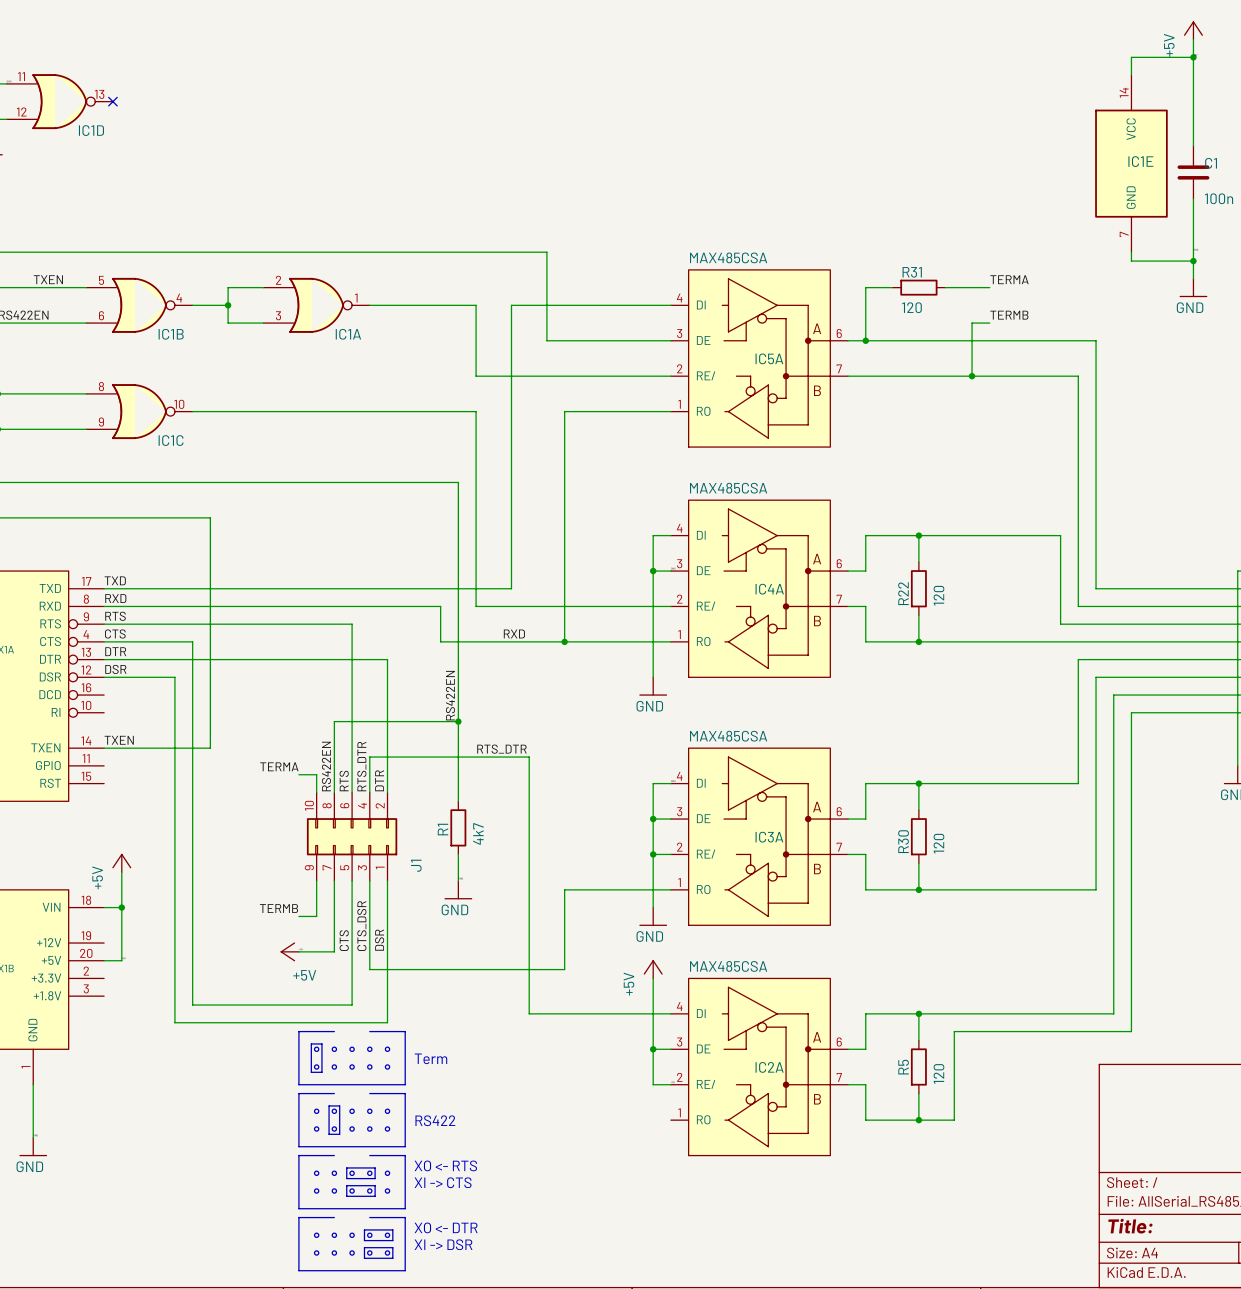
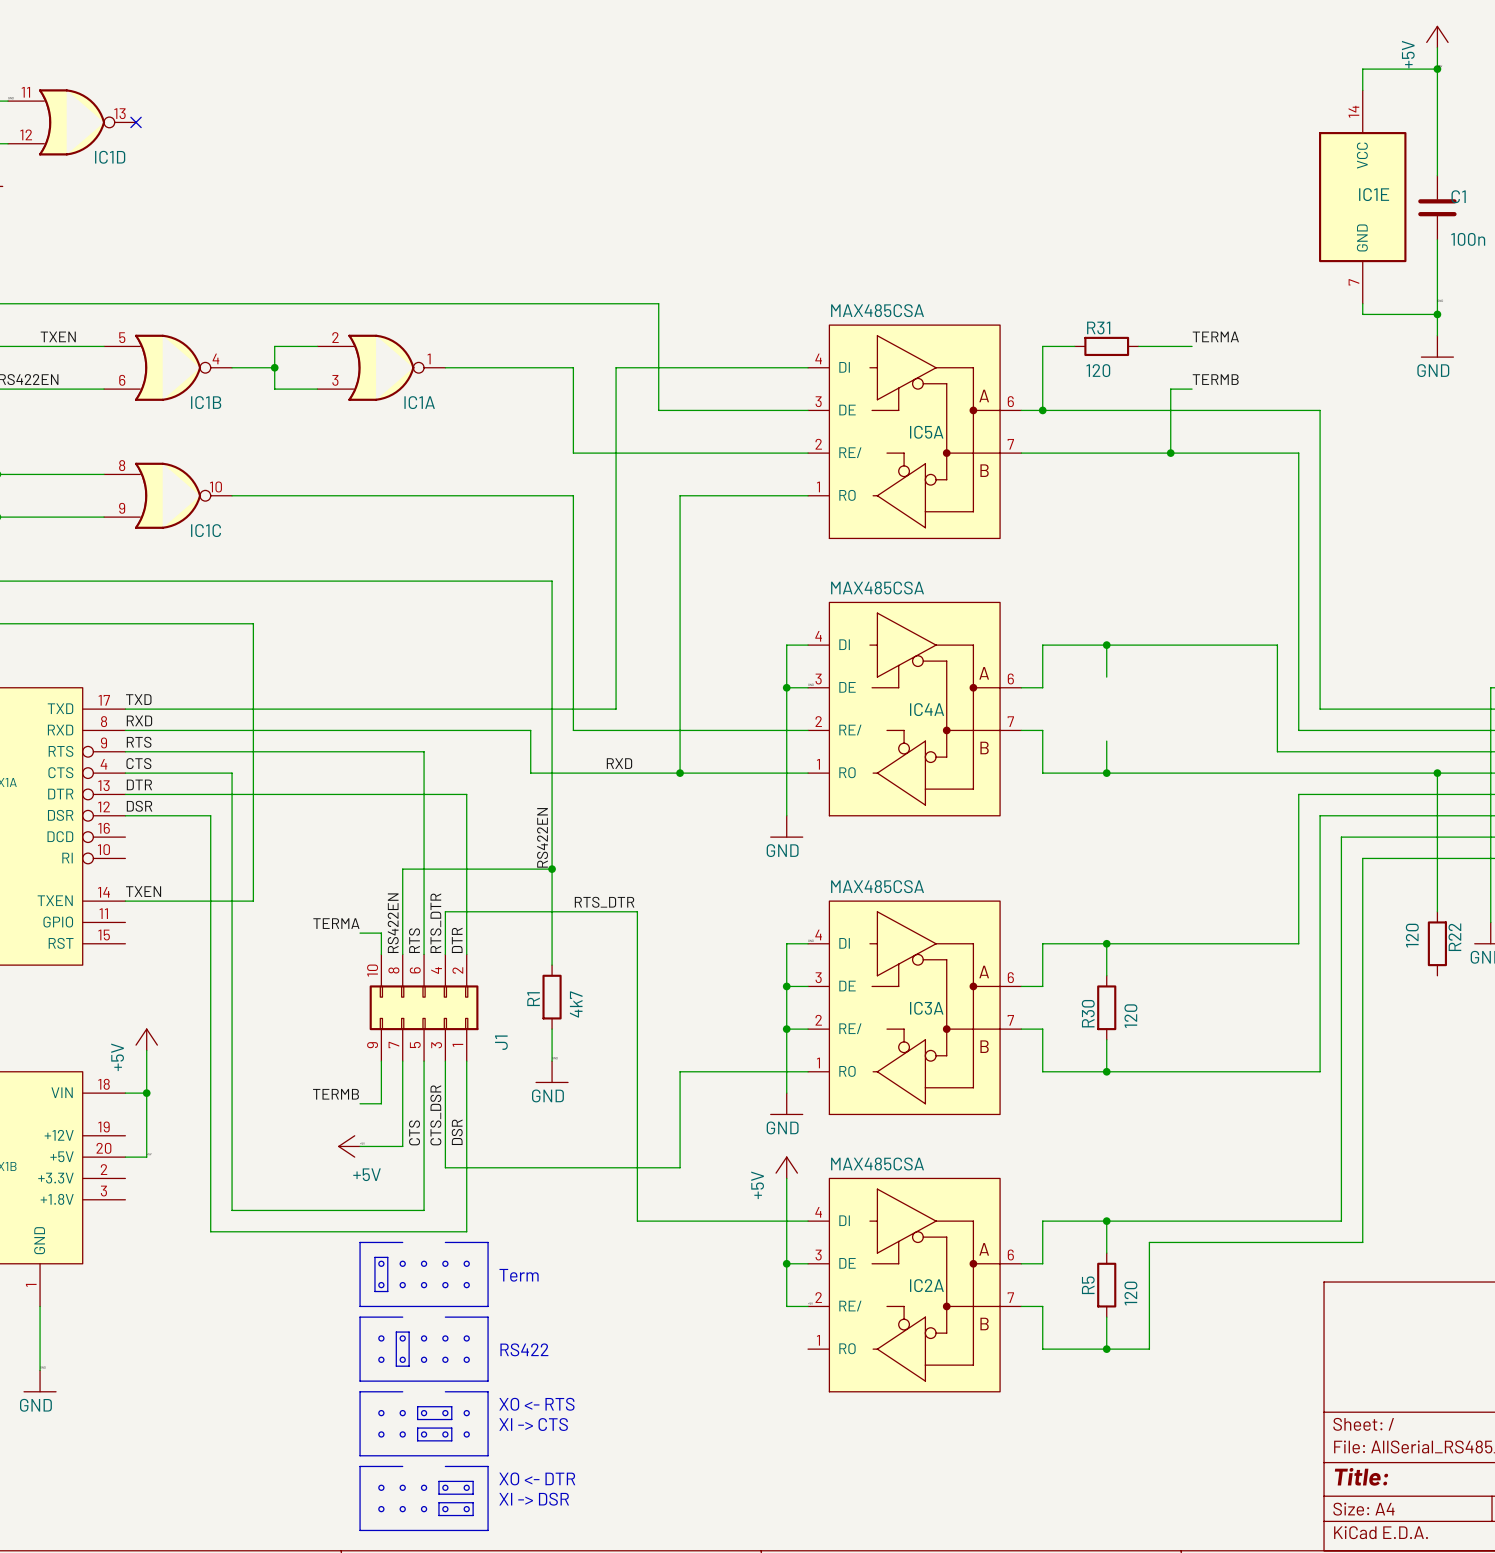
R22 position: (918, 588) -> (1437, 943)
R22 name position: R22 (903, 593) -> R22 (1454, 937)
R22 value position: 120 (938, 595) -> 120 (1412, 935)
wire: none -> (1437, 773) (1437, 911)
junction: none -> (1437, 773)

